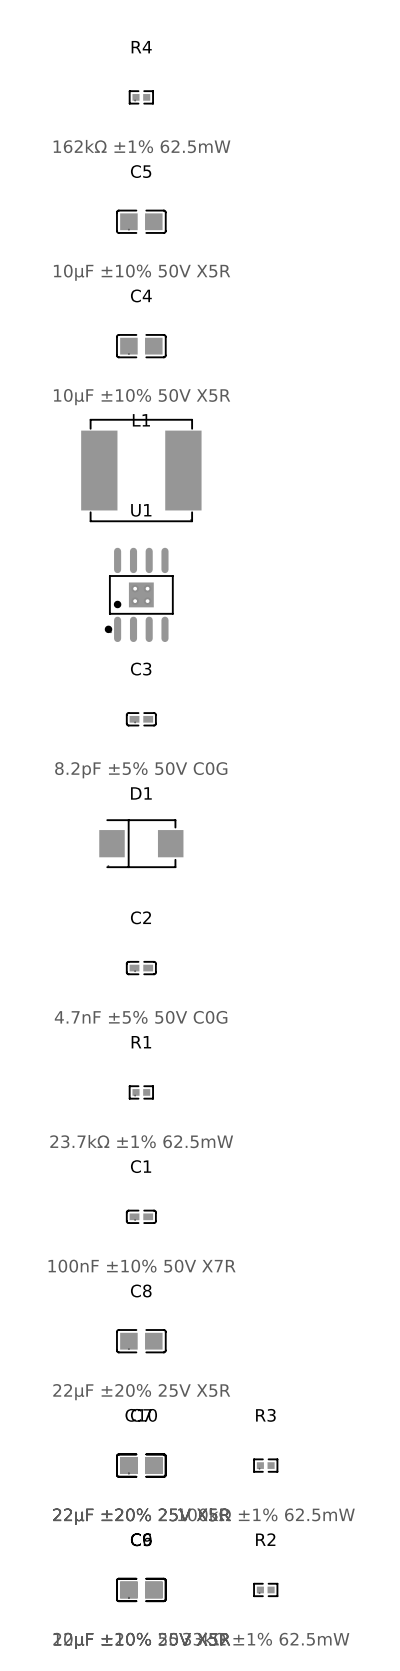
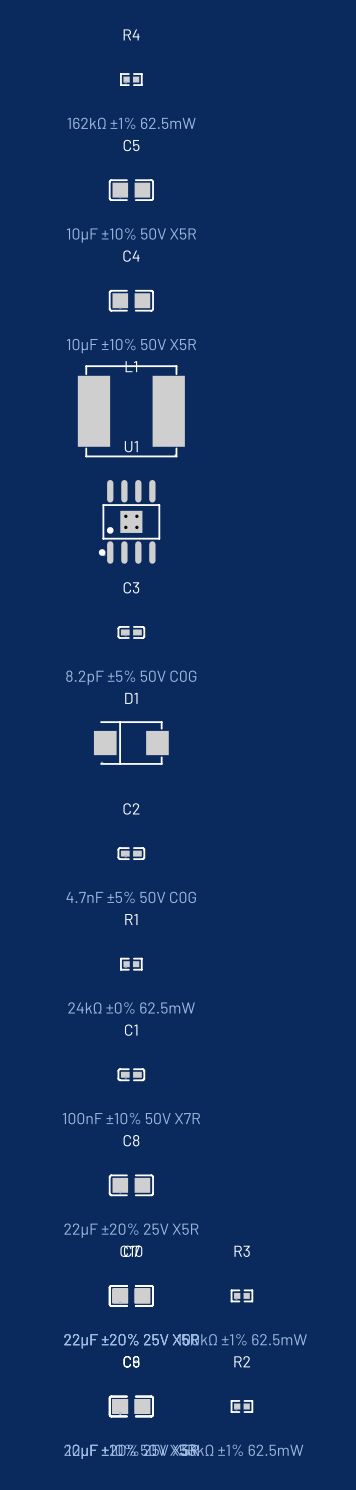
R1 value: 23.7kΩ ±1% 62.5mW (141, 1141) -> 24kΩ ±0% 62.5mW (131, 1008)

